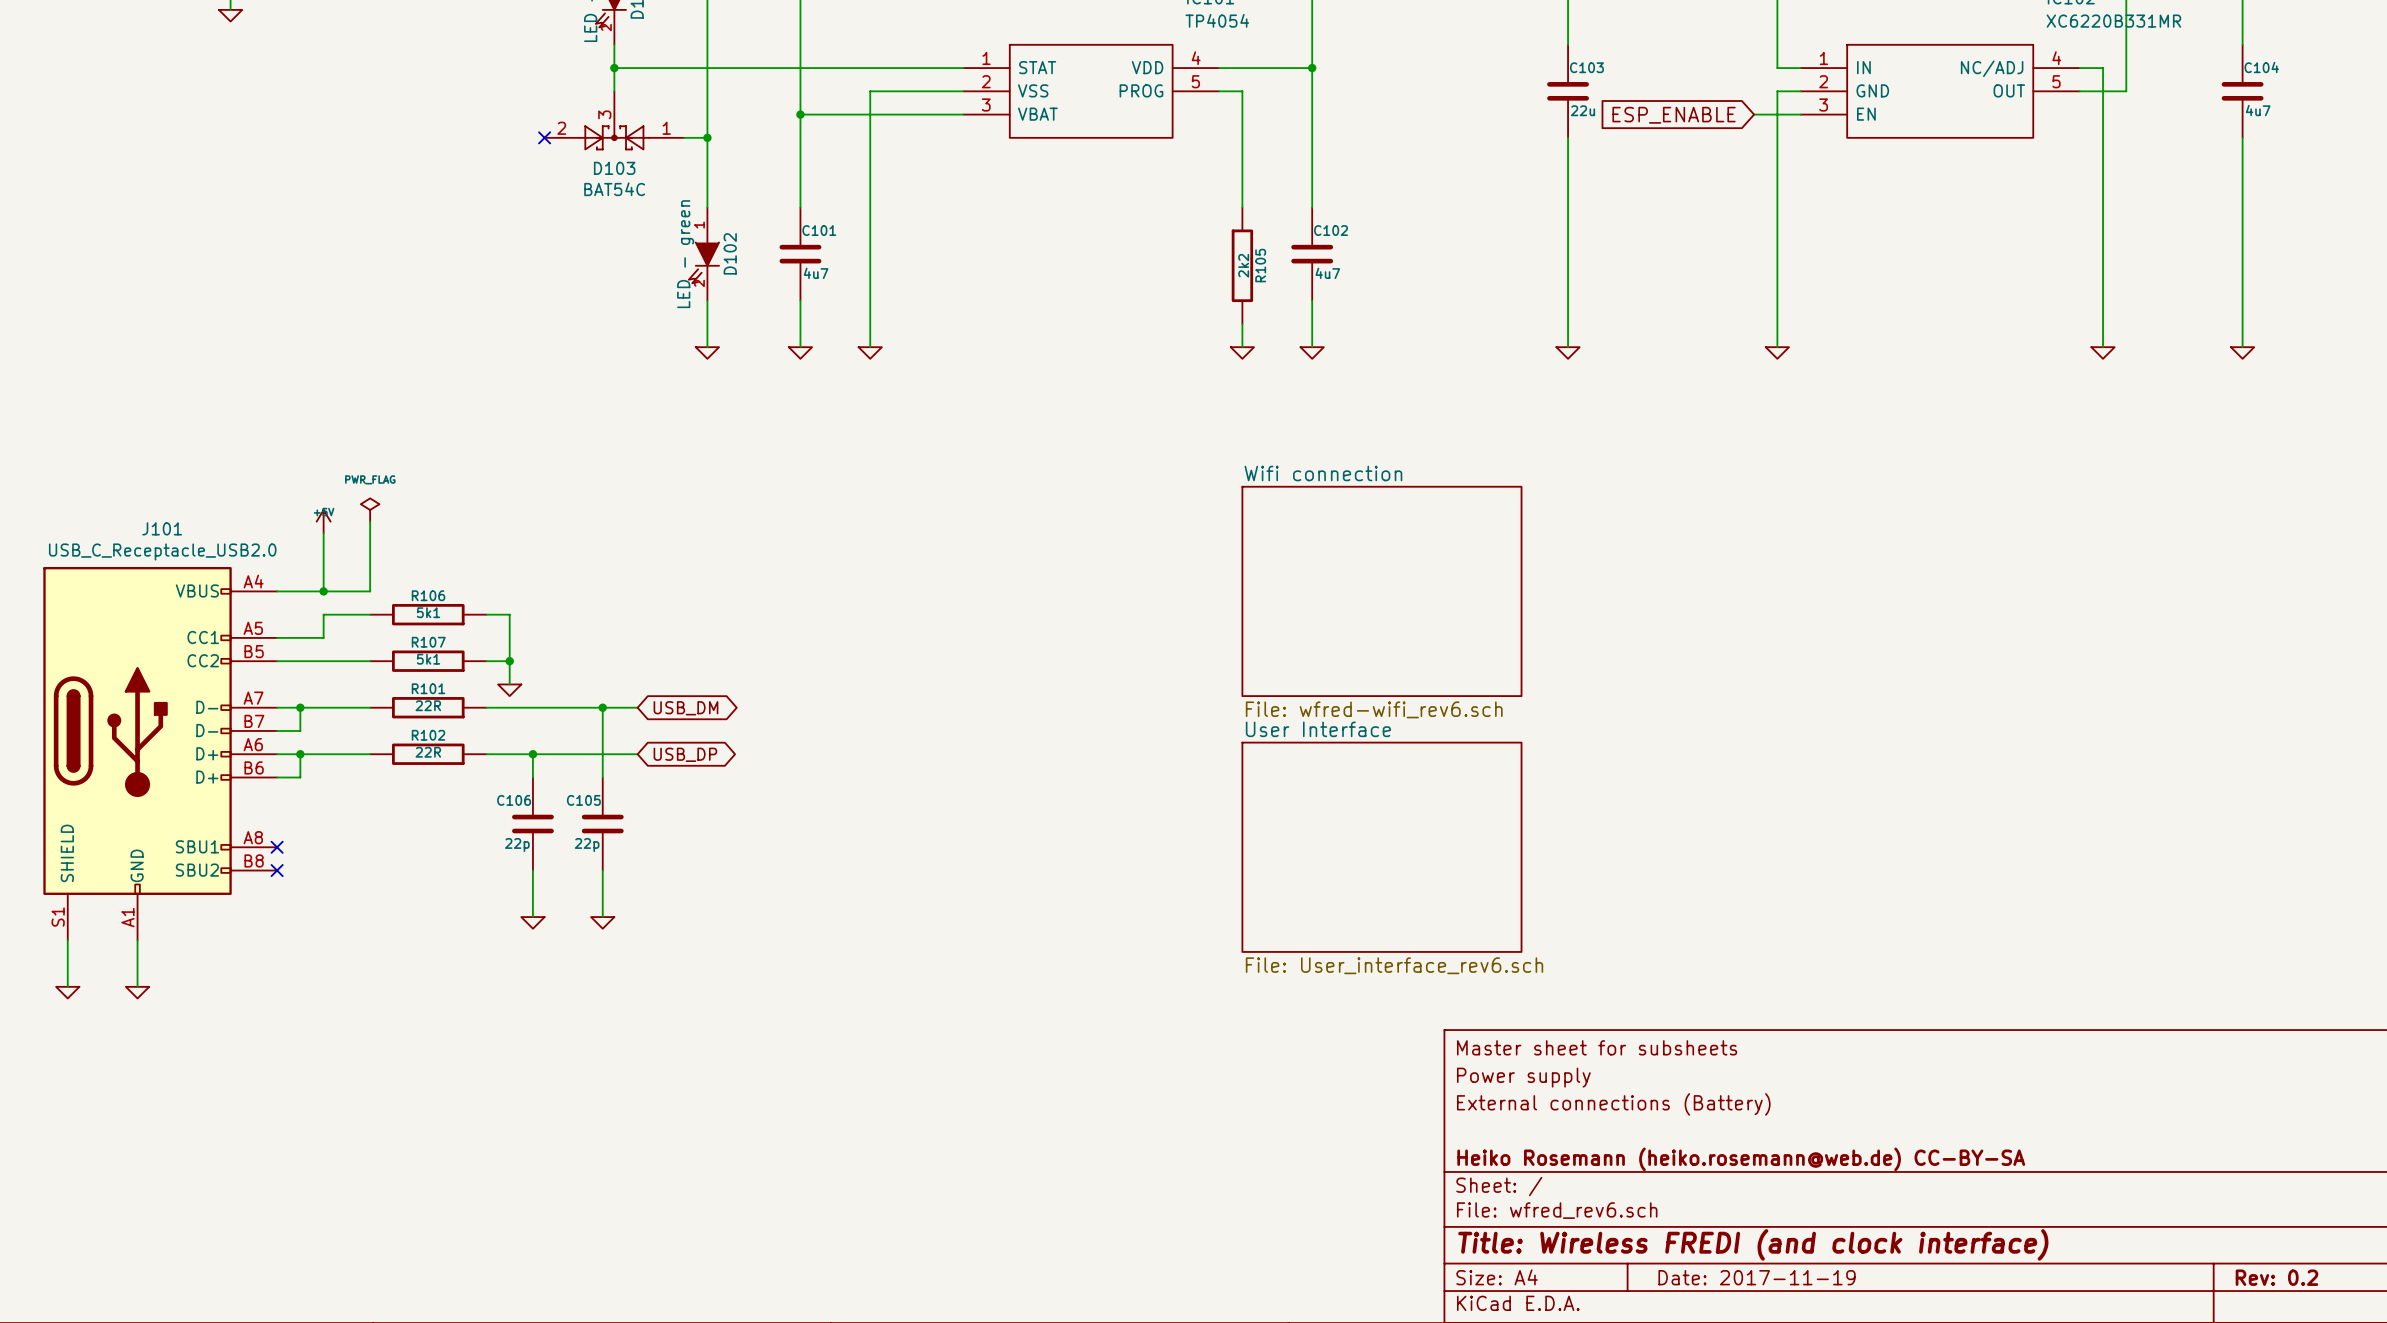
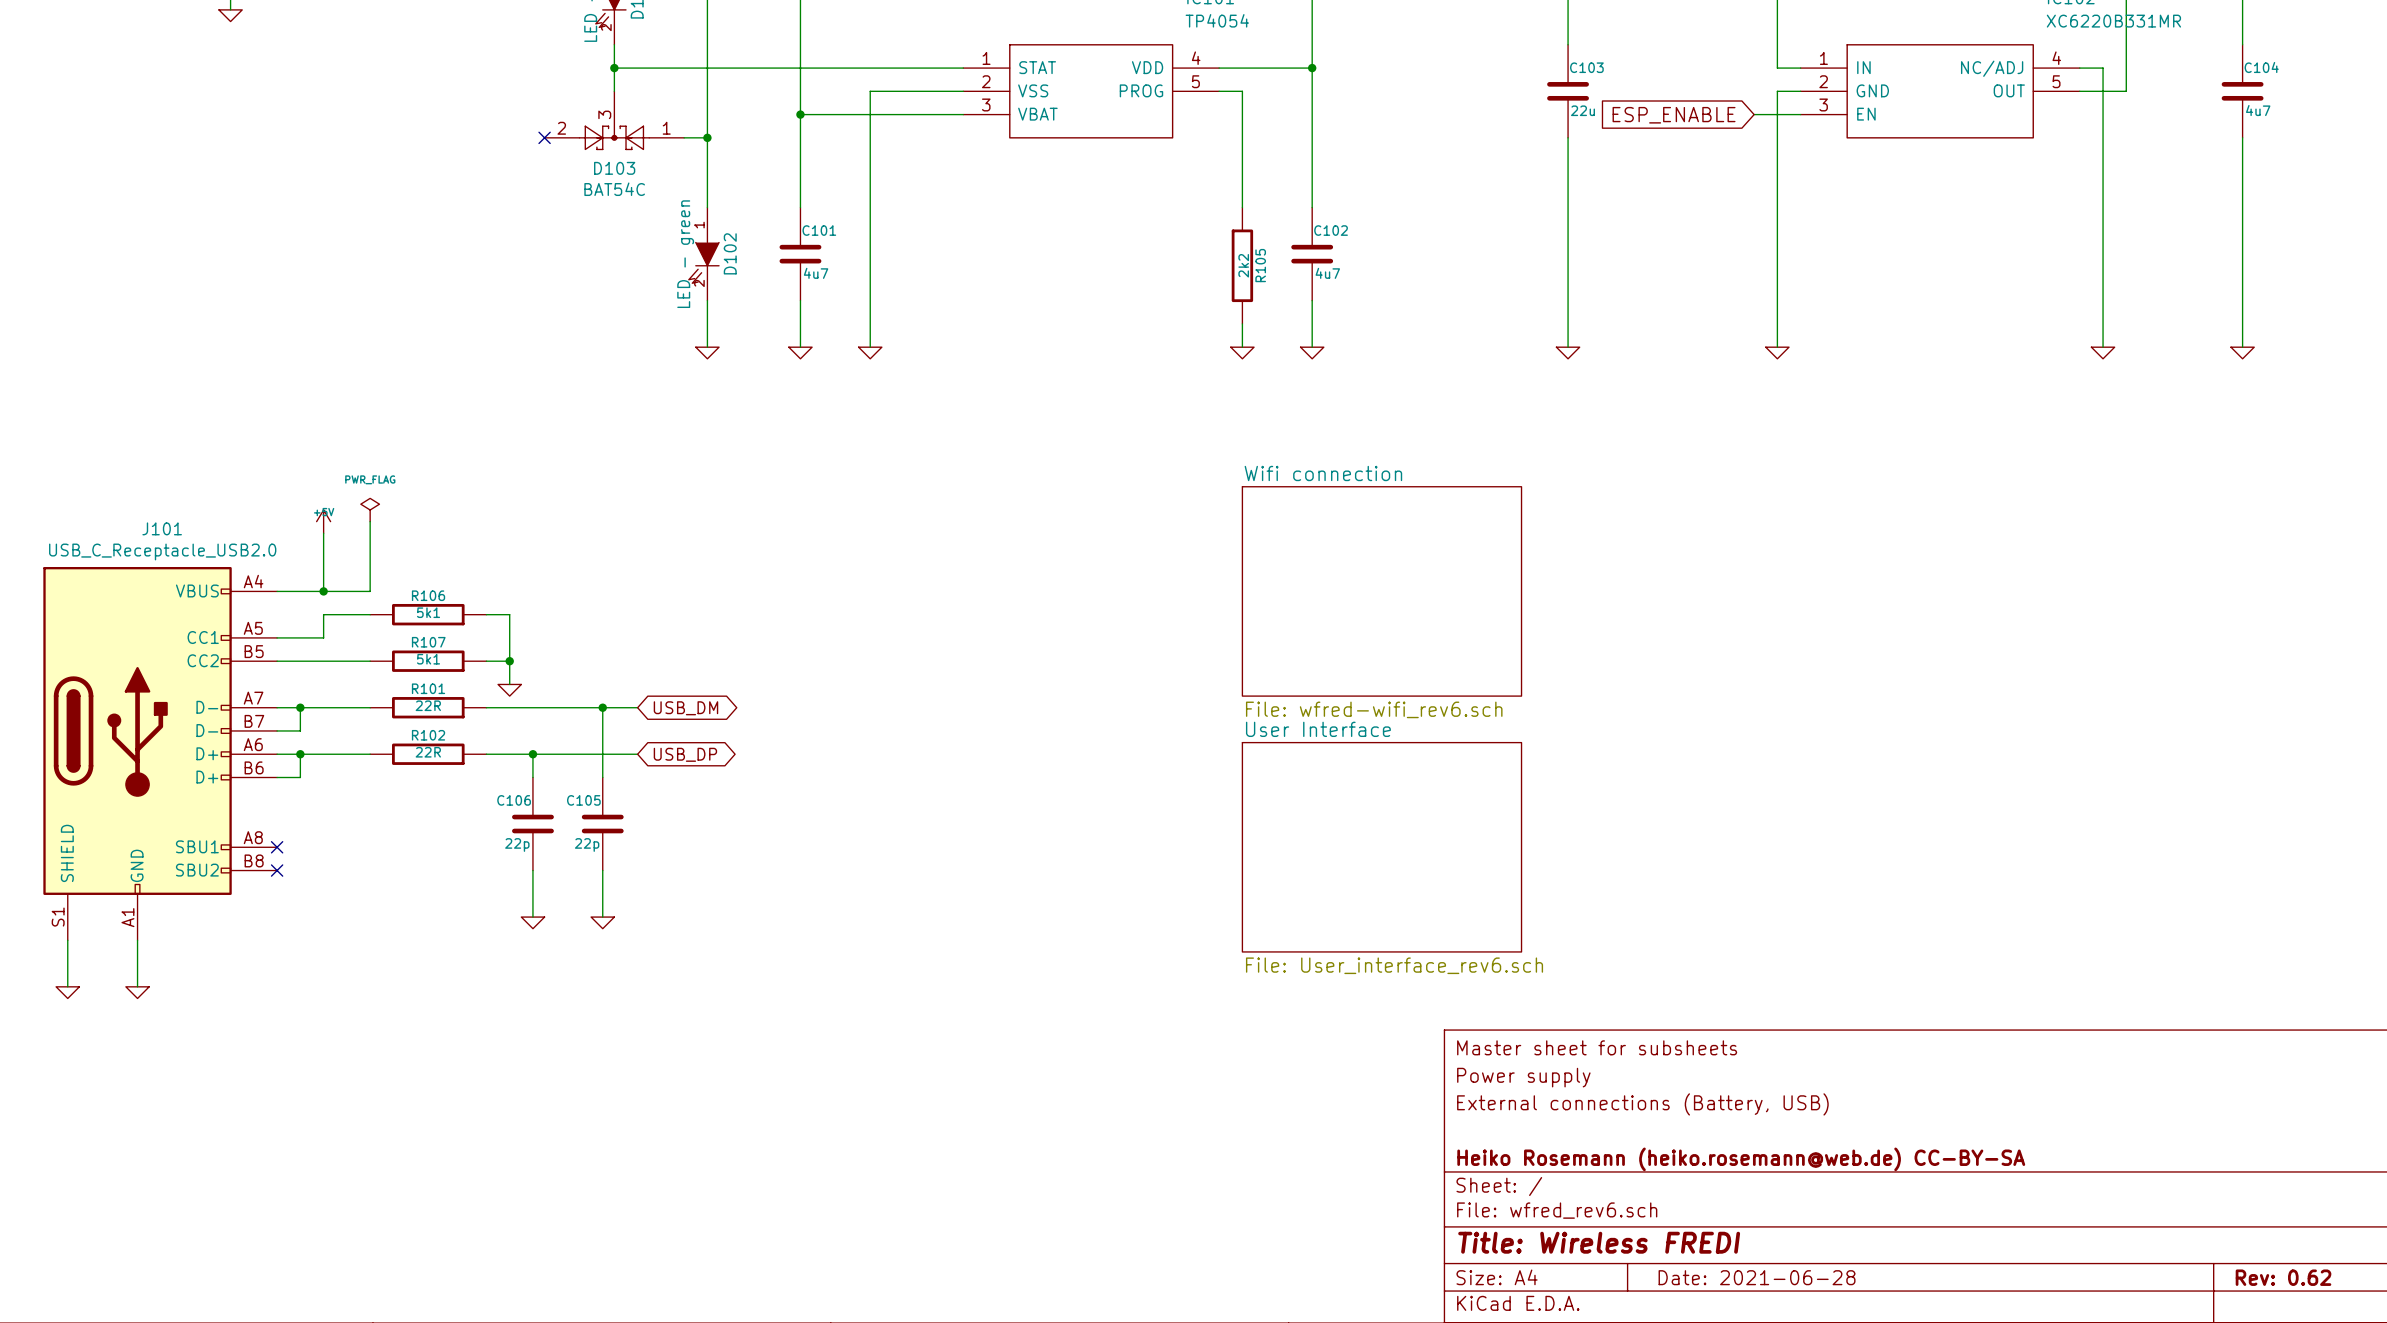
title block: External connections (Battery) (1613, 1104) -> External connections (Battery, USB) (1642, 1104)
title block: Title: Wireless FREDI (and clock interface) (1753, 1244) -> Title: Wireless FREDI (1599, 1242)
title block: Date: 2017-11-19 (1757, 1277) -> Date: 2021-06-28 (1757, 1277)
title block: Rev: 0.2 (2276, 1277) -> Rev: 0.62 (2283, 1277)

